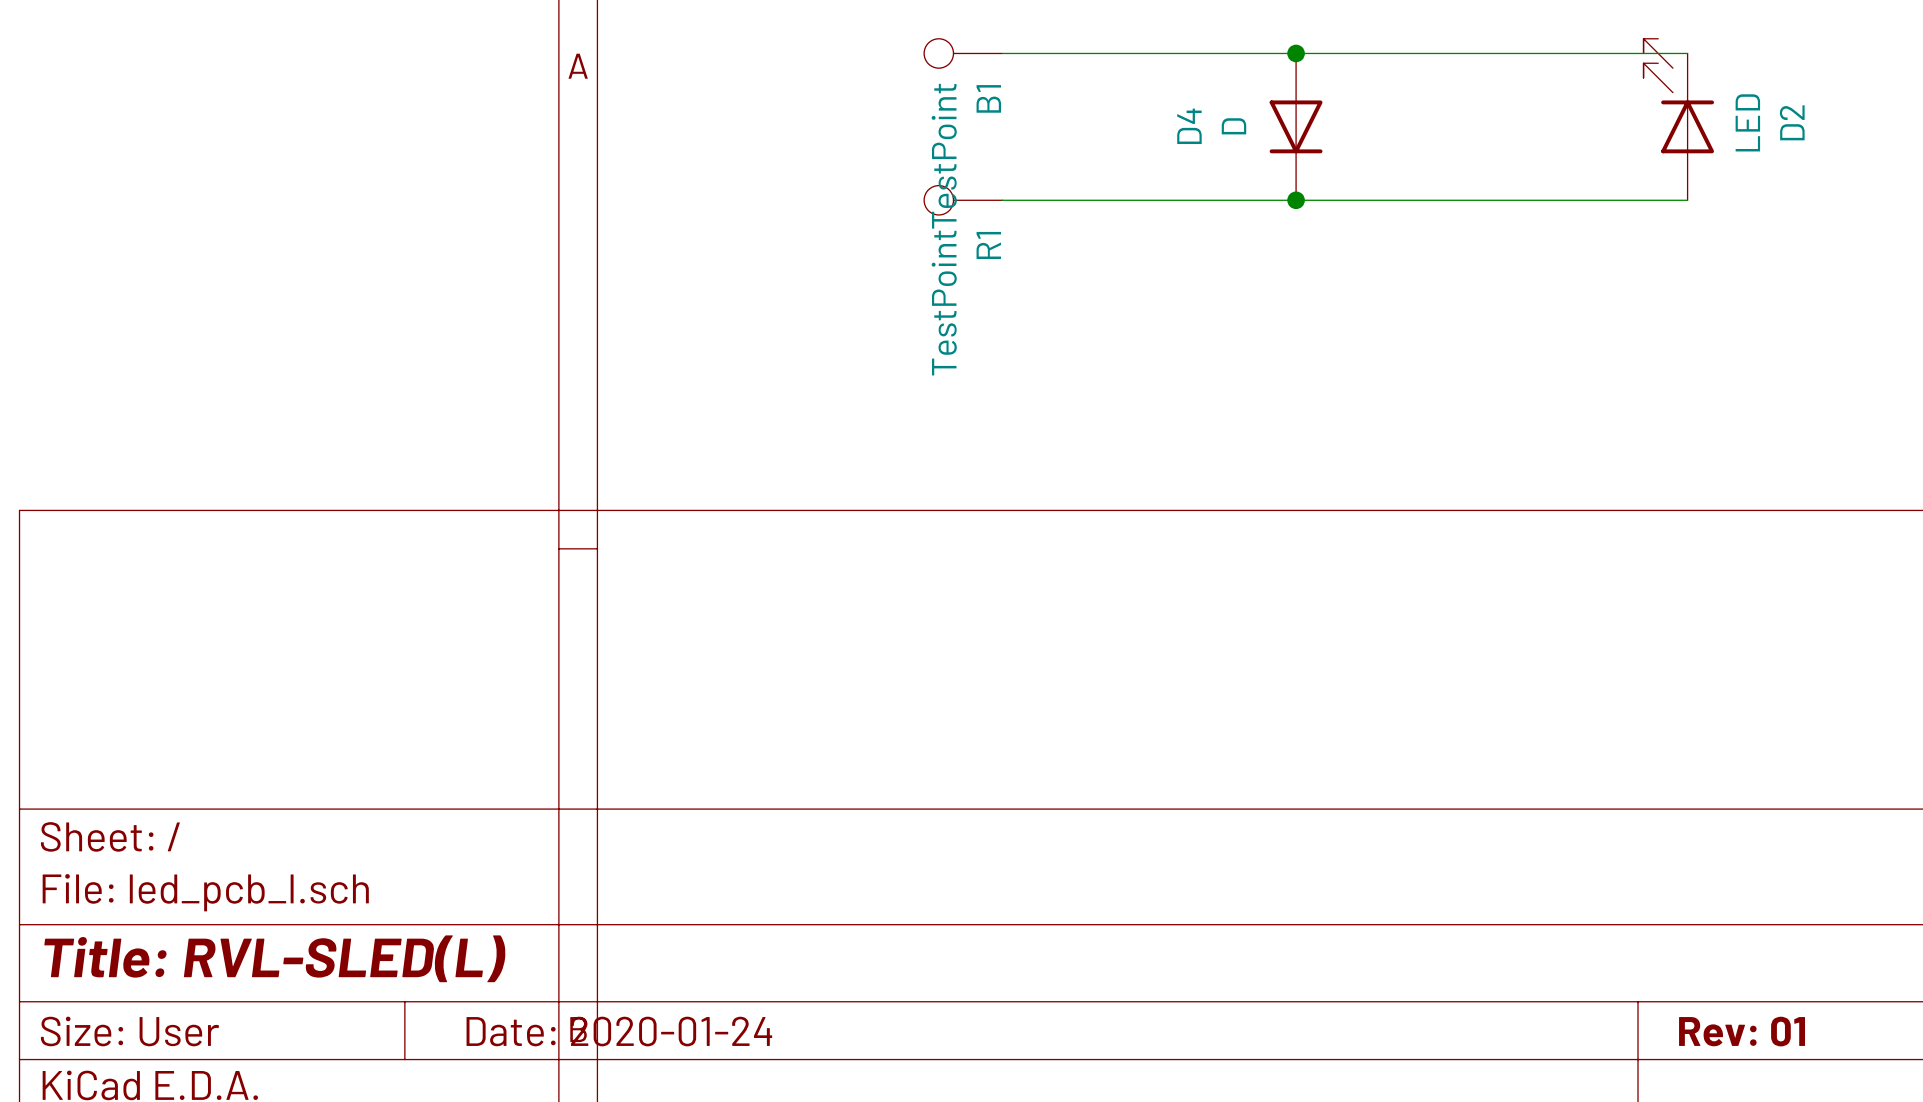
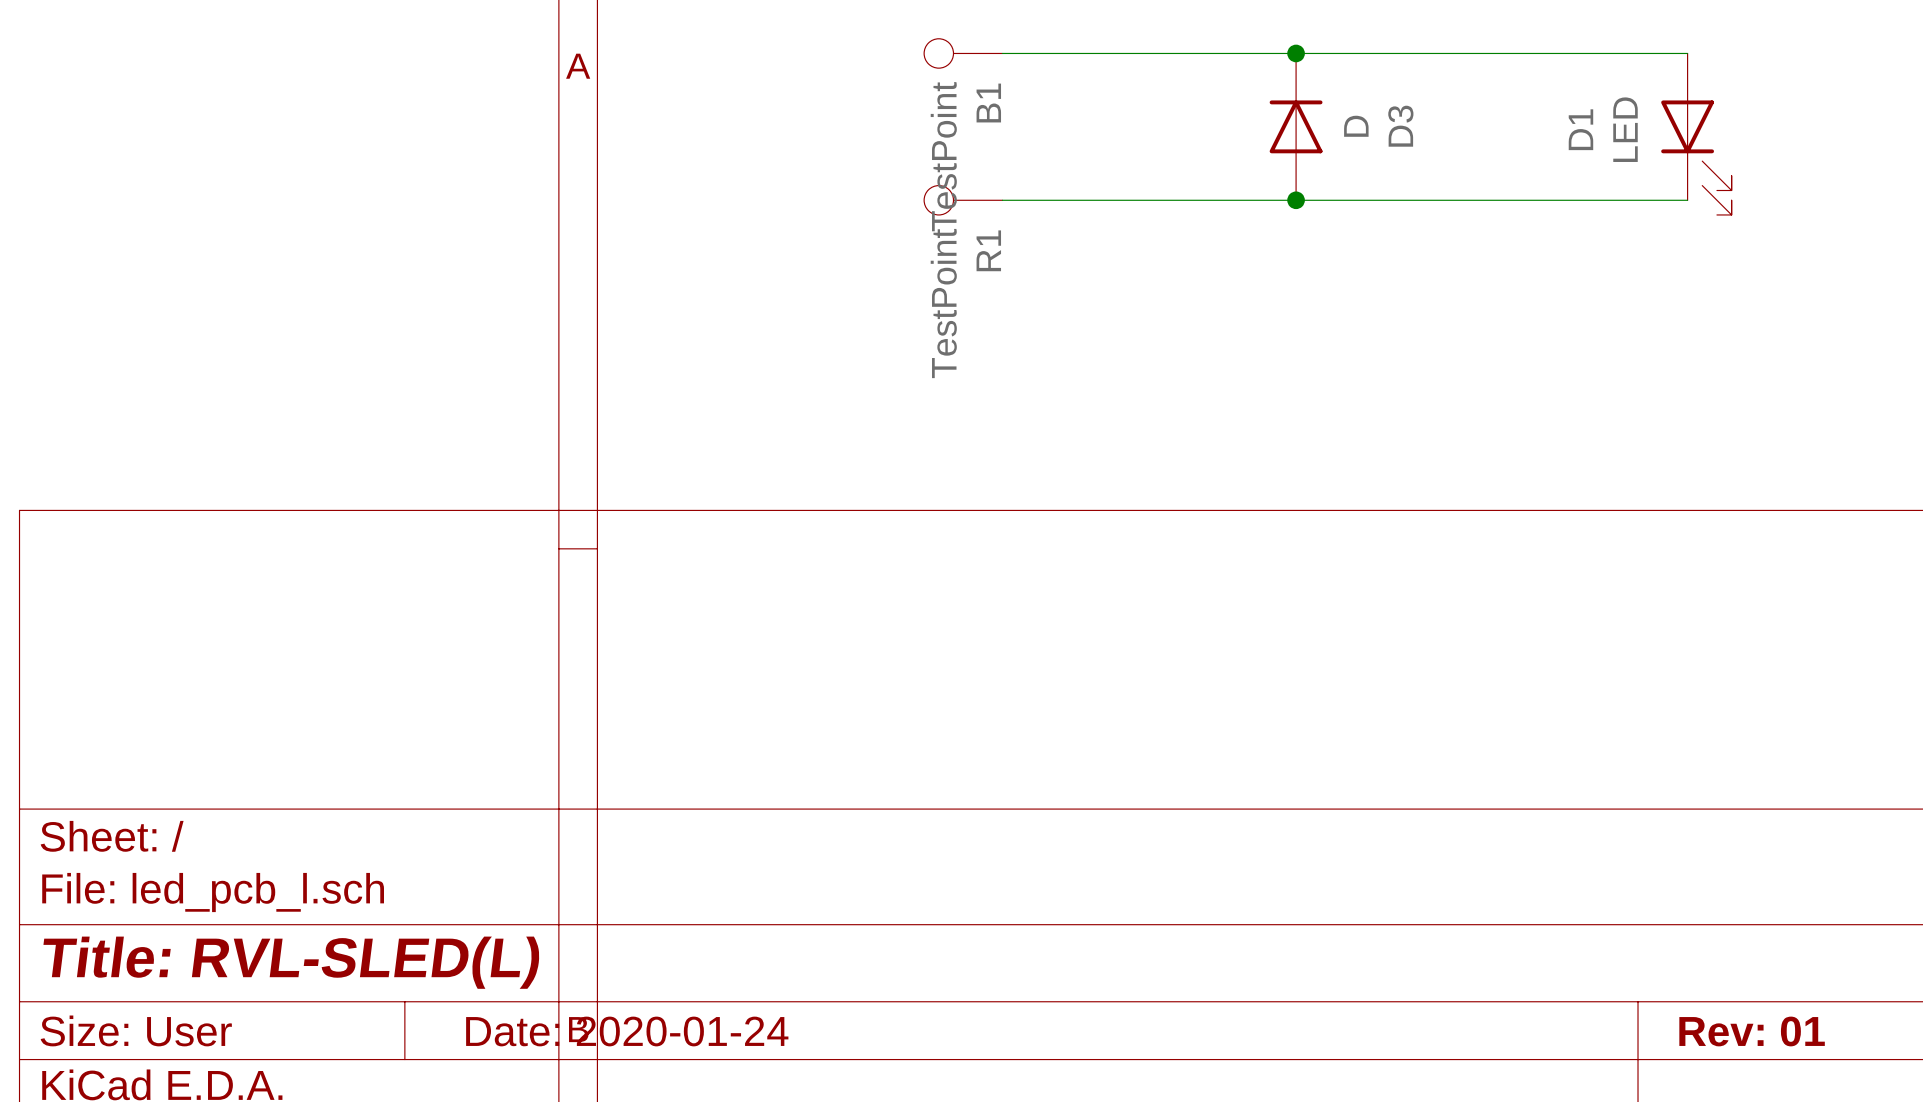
D2: LED (1678, 119) -> none
D4: D (1296, 126) -> none
D3: none -> D (1296, 126)
D1: none -> LED (1696, 134)

